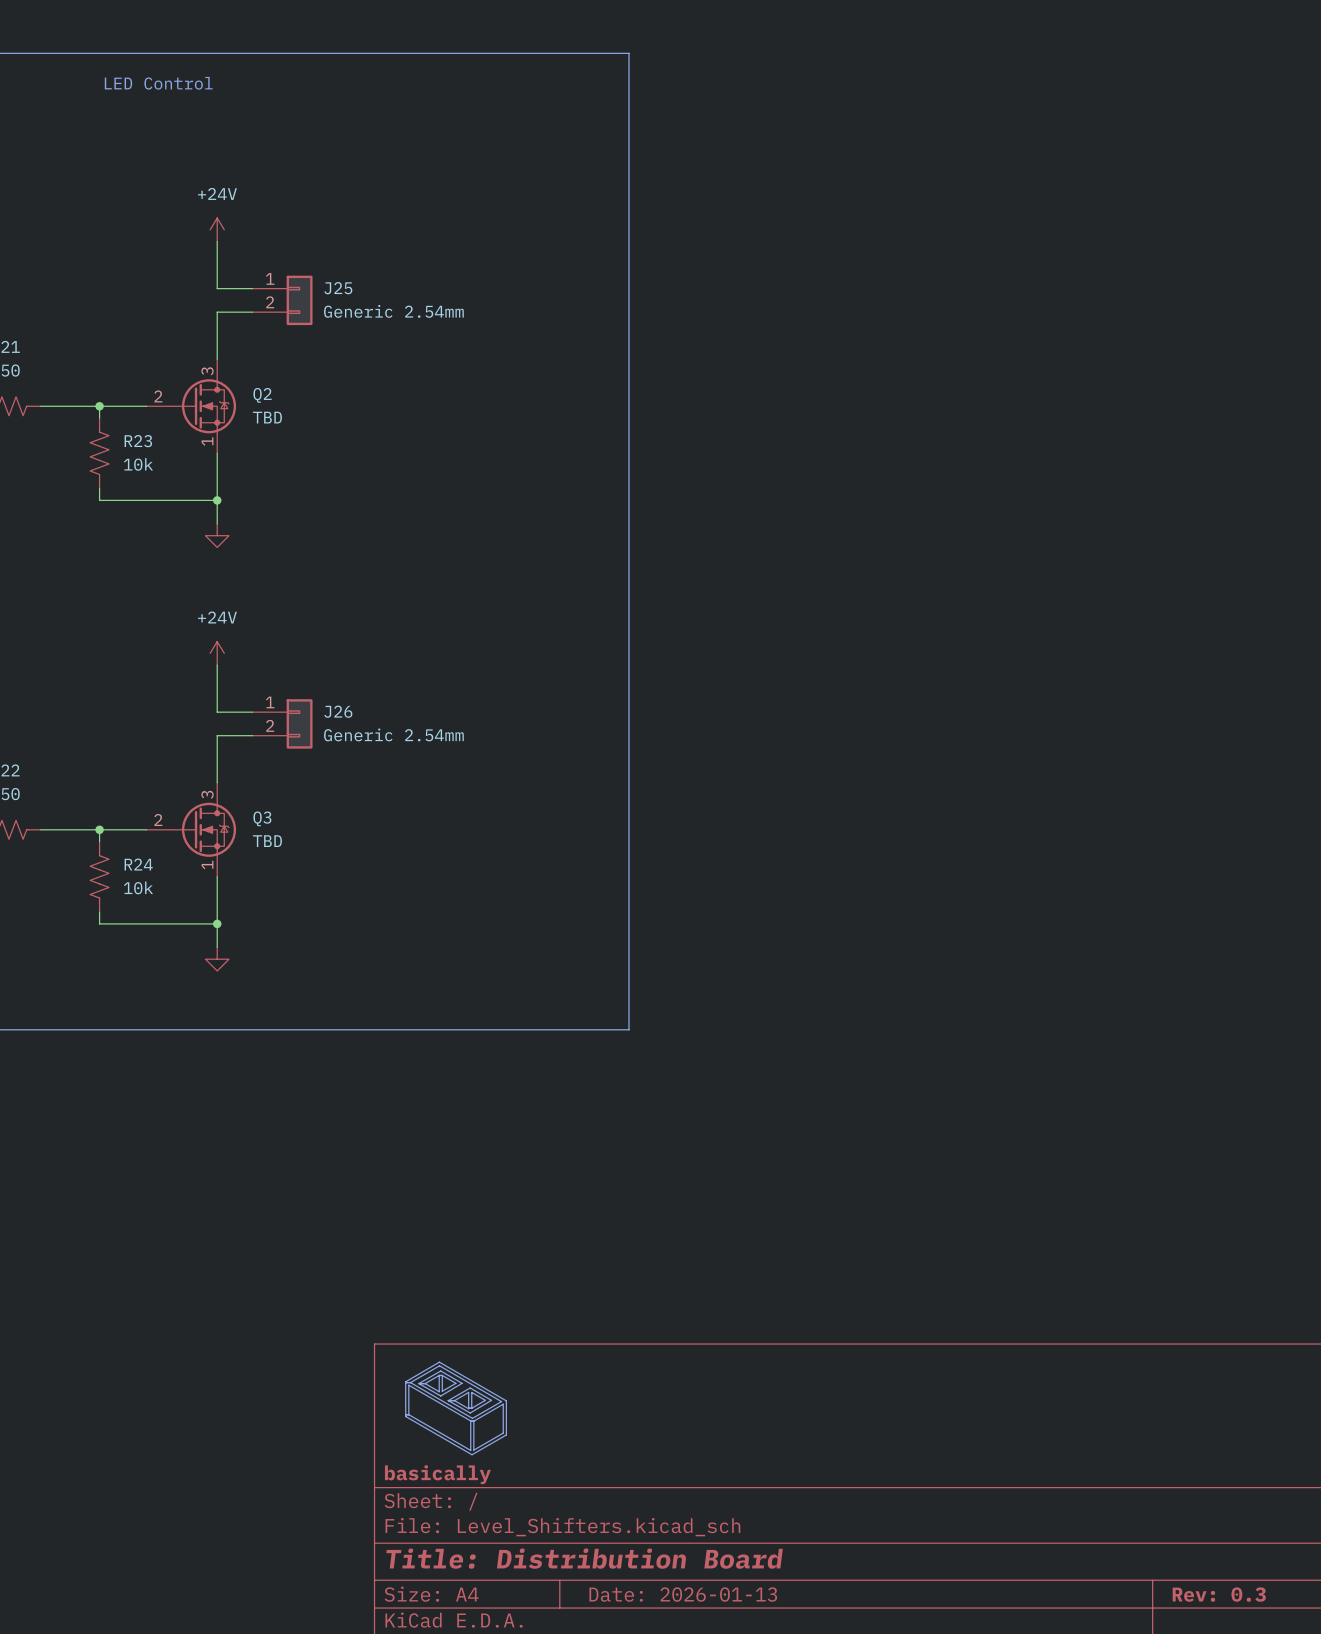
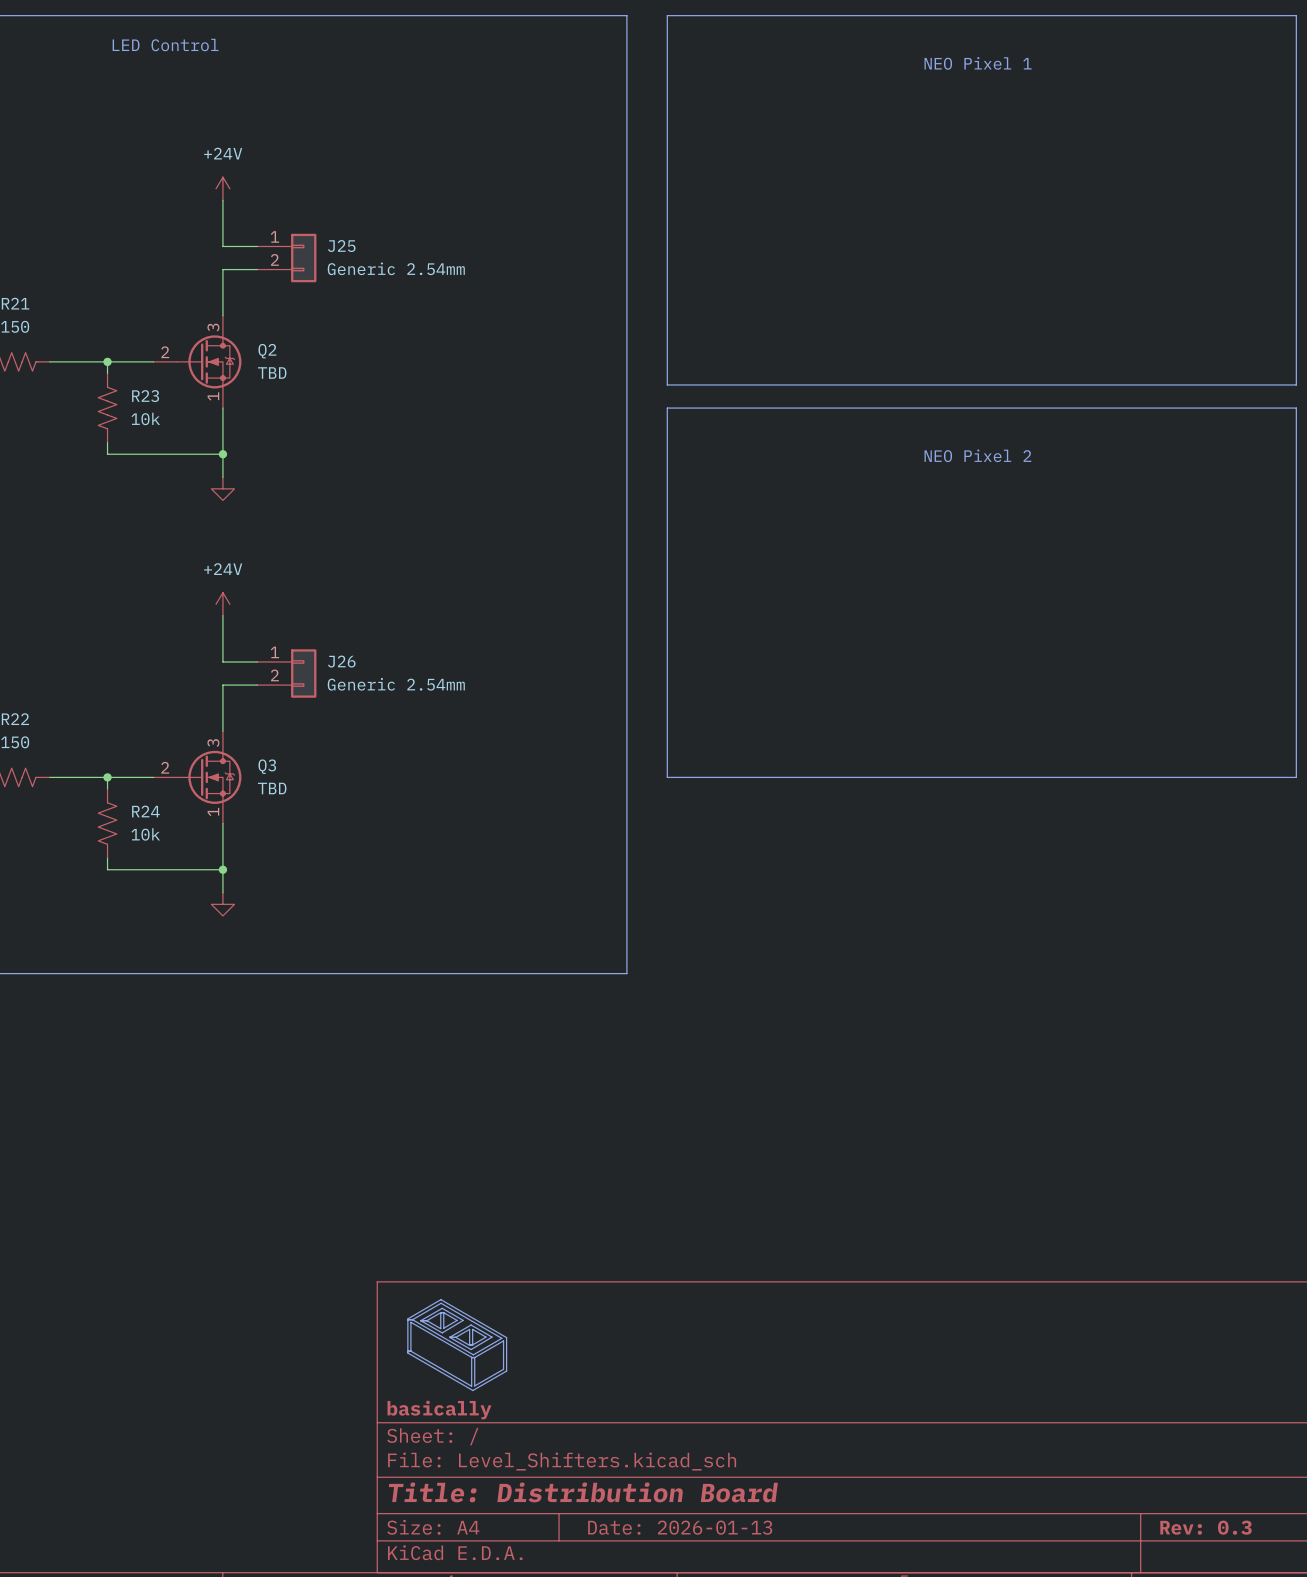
line: none -> (667, 15) (1296, 15) (1296, 384) (667, 384) (667, 15)
text: none -> NEO Pixel 1 (978, 63)
line: none -> (667, 408) (667, 777) (1296, 777) (1296, 408) (667, 408)
text: none -> NEO Pixel 2 (977, 455)

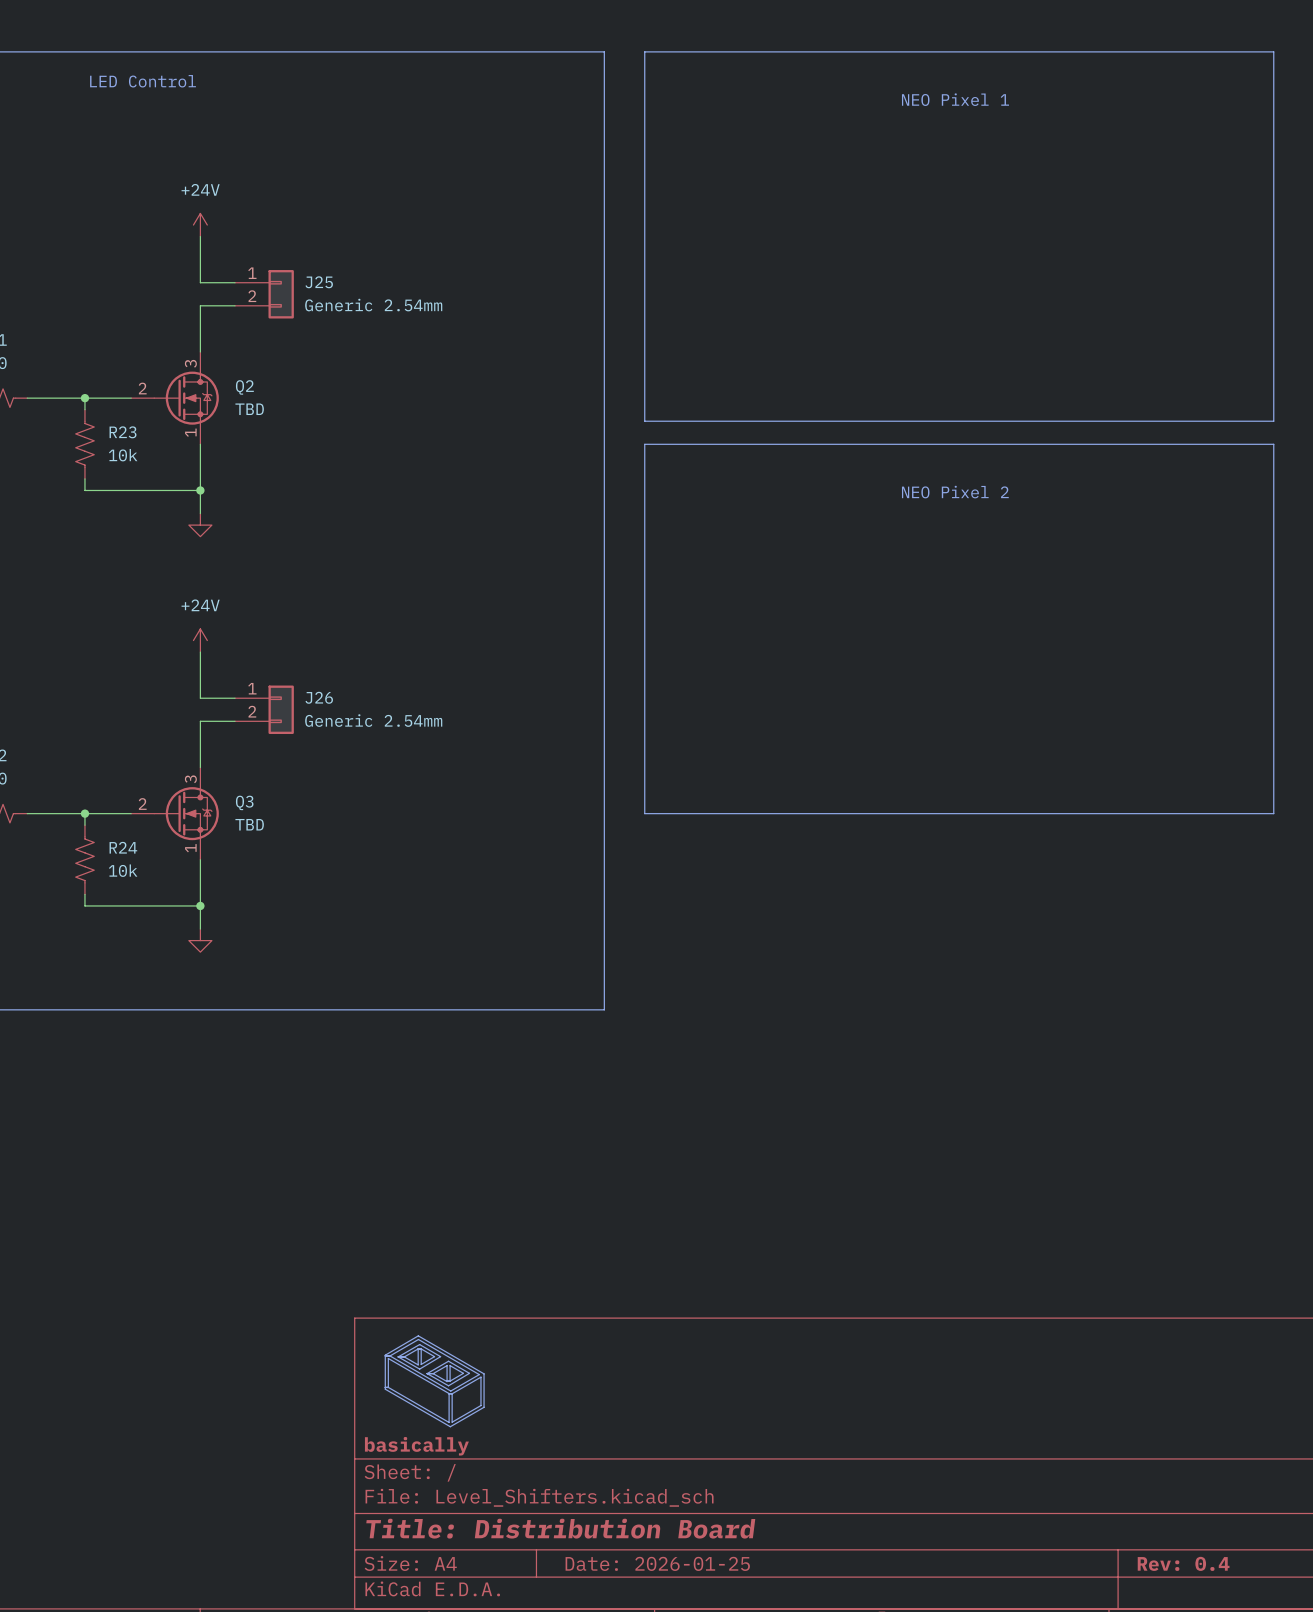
title block: Date: 2026-01-13 (680, 1527) -> Date: 2026-01-25 (657, 1563)
title block: Rev: 0.3 (1206, 1527) -> Rev: 0.4 (1183, 1563)

